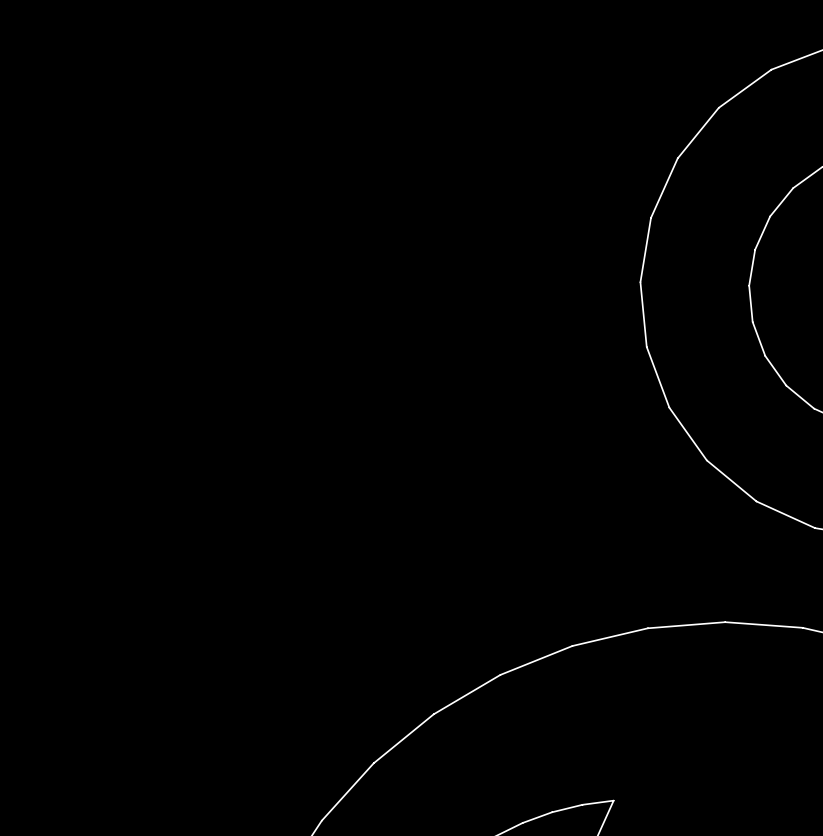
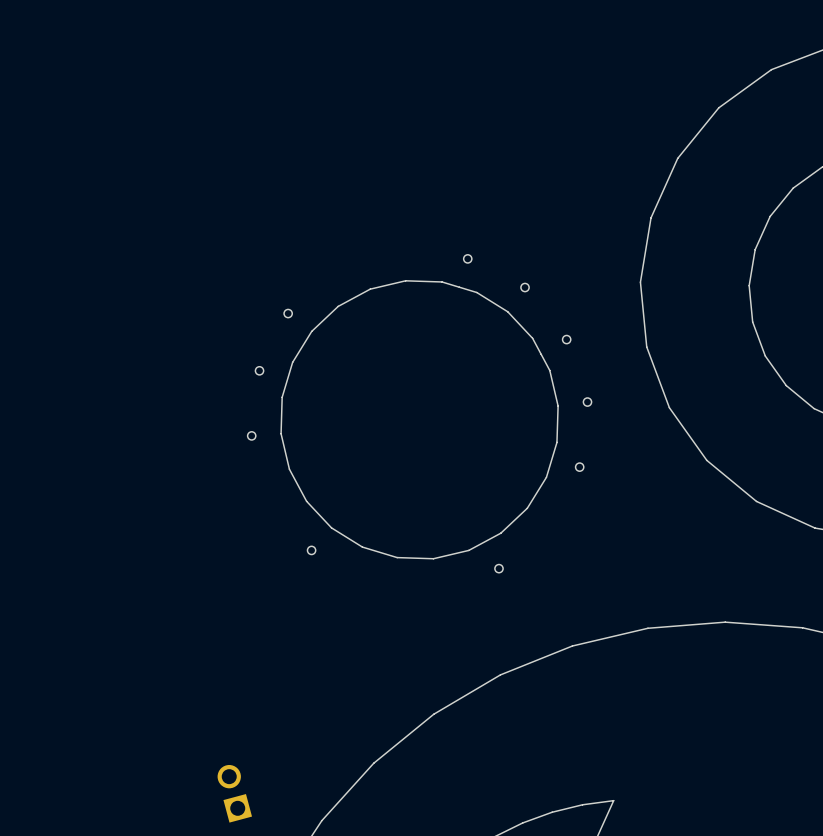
hole: none -> (467, 258)
board edge: none -> (405, 280) (370, 289) (338, 306) (311, 331) (292, 362) (282, 397) (281, 433) (289, 469) (306, 501) (331, 527) (362, 547) (397, 557) (433, 558) (468, 550) (500, 533) (527, 508) (546, 477) (556, 442) (558, 406) (549, 370) (532, 338) (507, 311) (476, 292) (442, 281) (405, 280)
hole: none -> (525, 287)
hole: none -> (288, 313)
hole: none -> (566, 339)
hole: none -> (259, 370)
hole: none -> (587, 402)
hole: none -> (251, 435)
hole: none -> (579, 467)
hole: none -> (311, 550)
hole: none -> (498, 568)
part: none -> (234, 793)

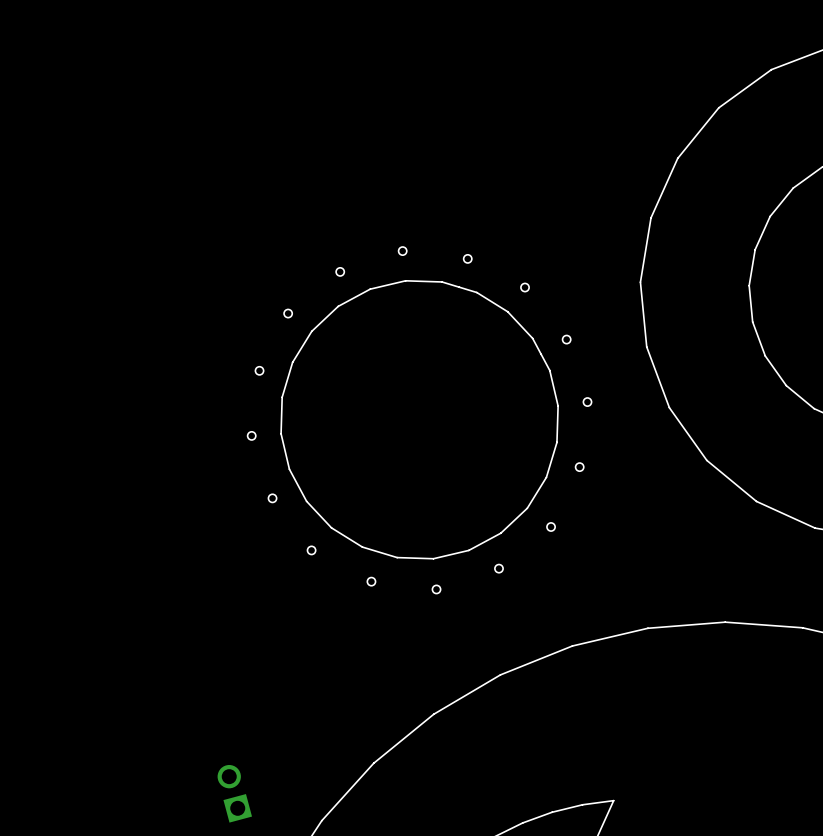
hole: none -> (402, 251)
hole: none -> (340, 271)
hole: none -> (272, 498)
hole: none -> (551, 526)
hole: none -> (371, 581)
hole: none -> (436, 589)

